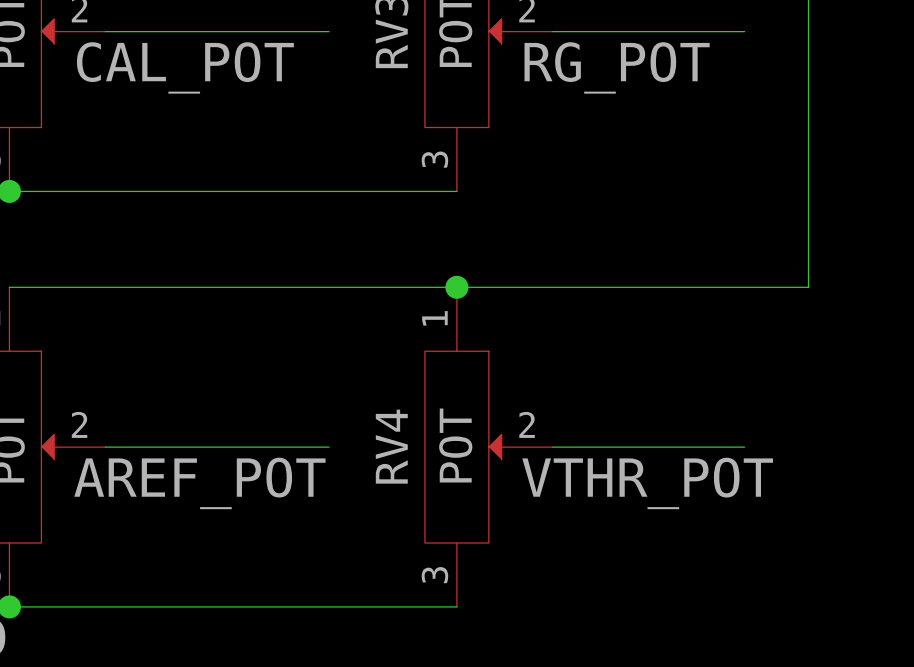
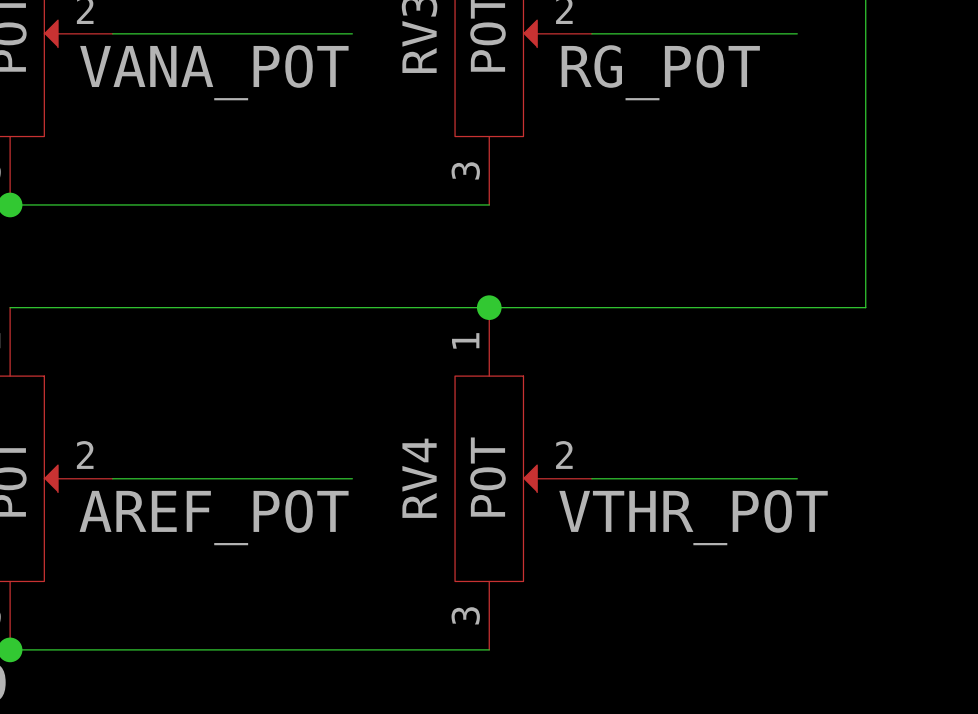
label: CAL_POT (185, 67) -> VANA_POT (214, 72)

